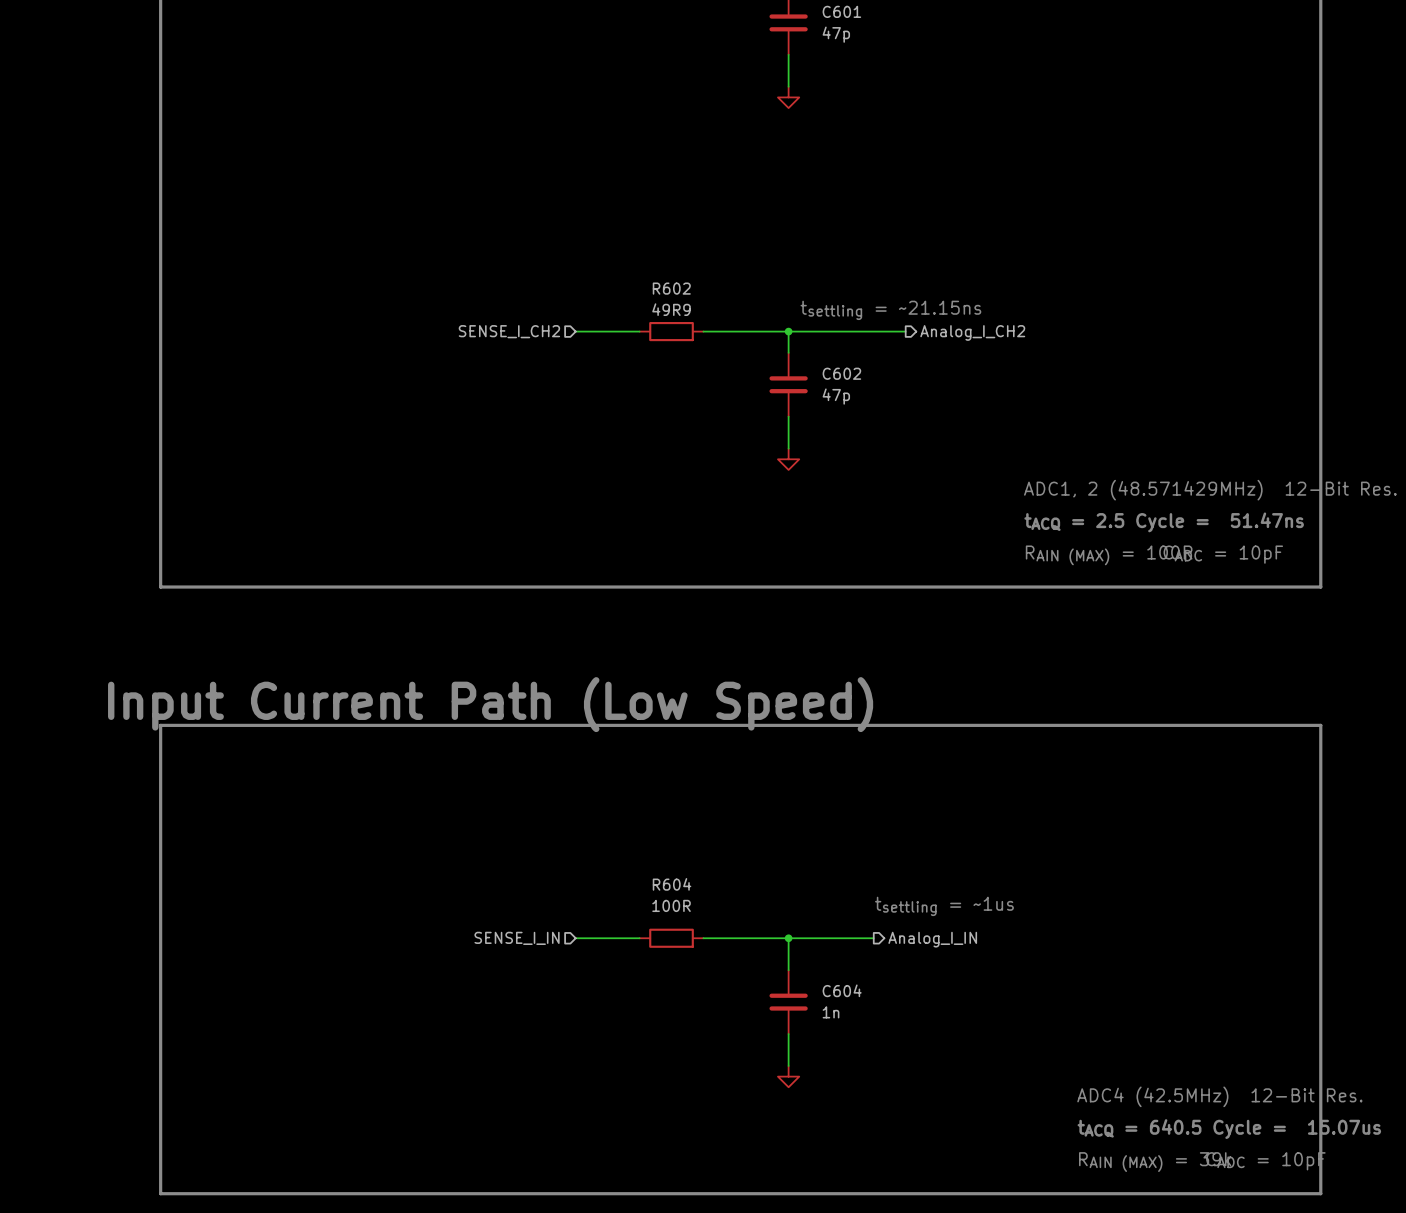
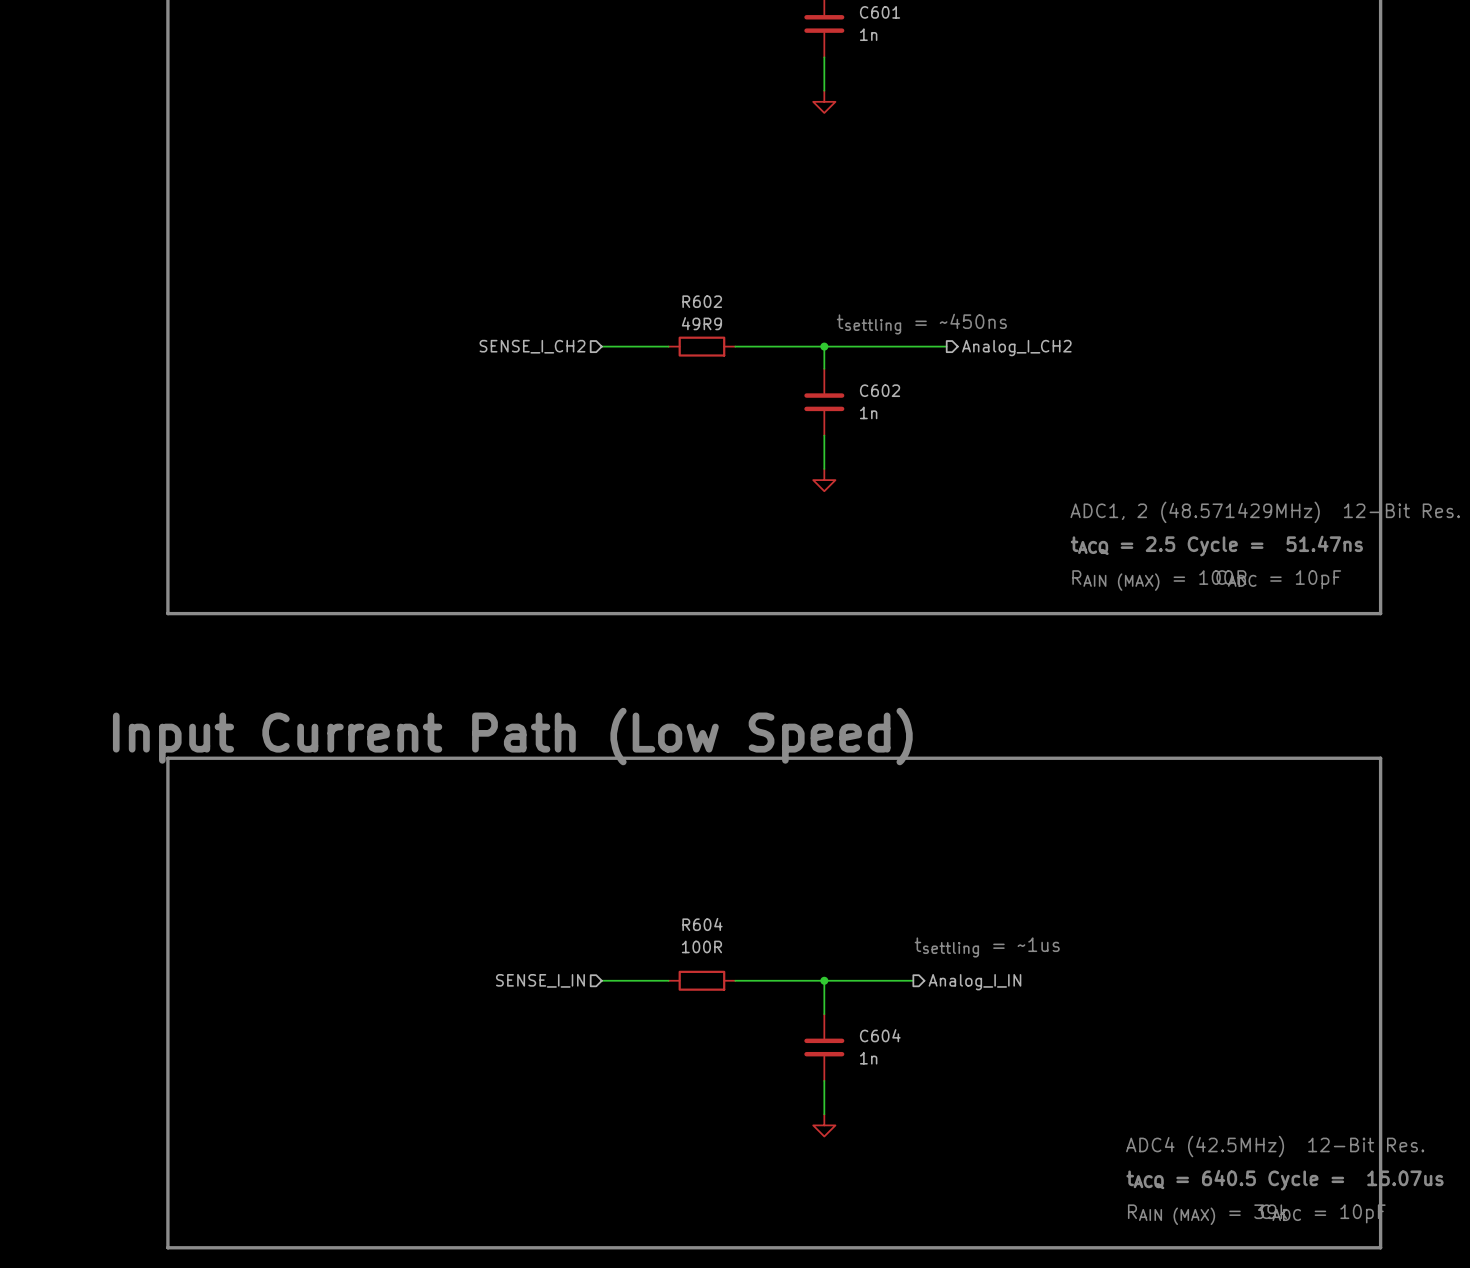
C601 value: 47p (836, 34) -> 1n (868, 34)
text: tsettling = ~21.15ns (890, 310) -> tsettling = ~450ns (921, 324)
C602 value: 47p (836, 396) -> 1n (868, 412)

